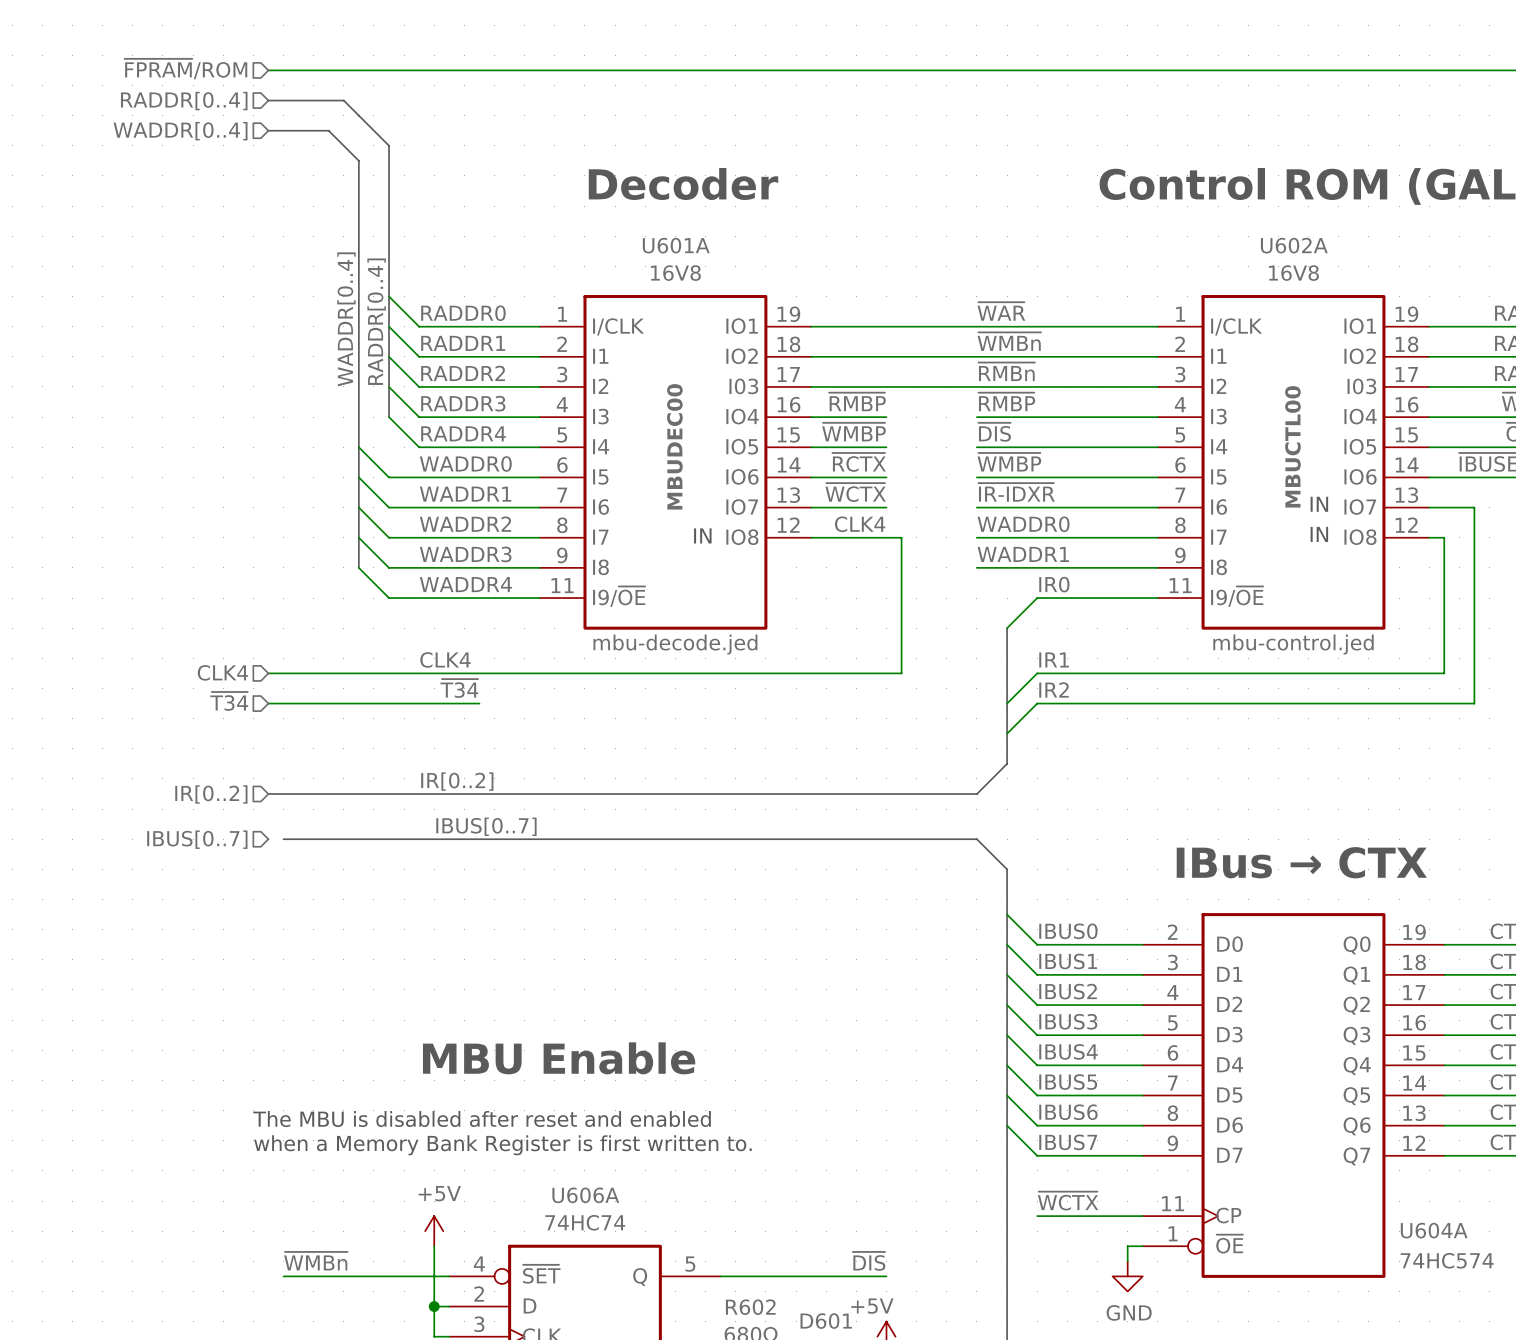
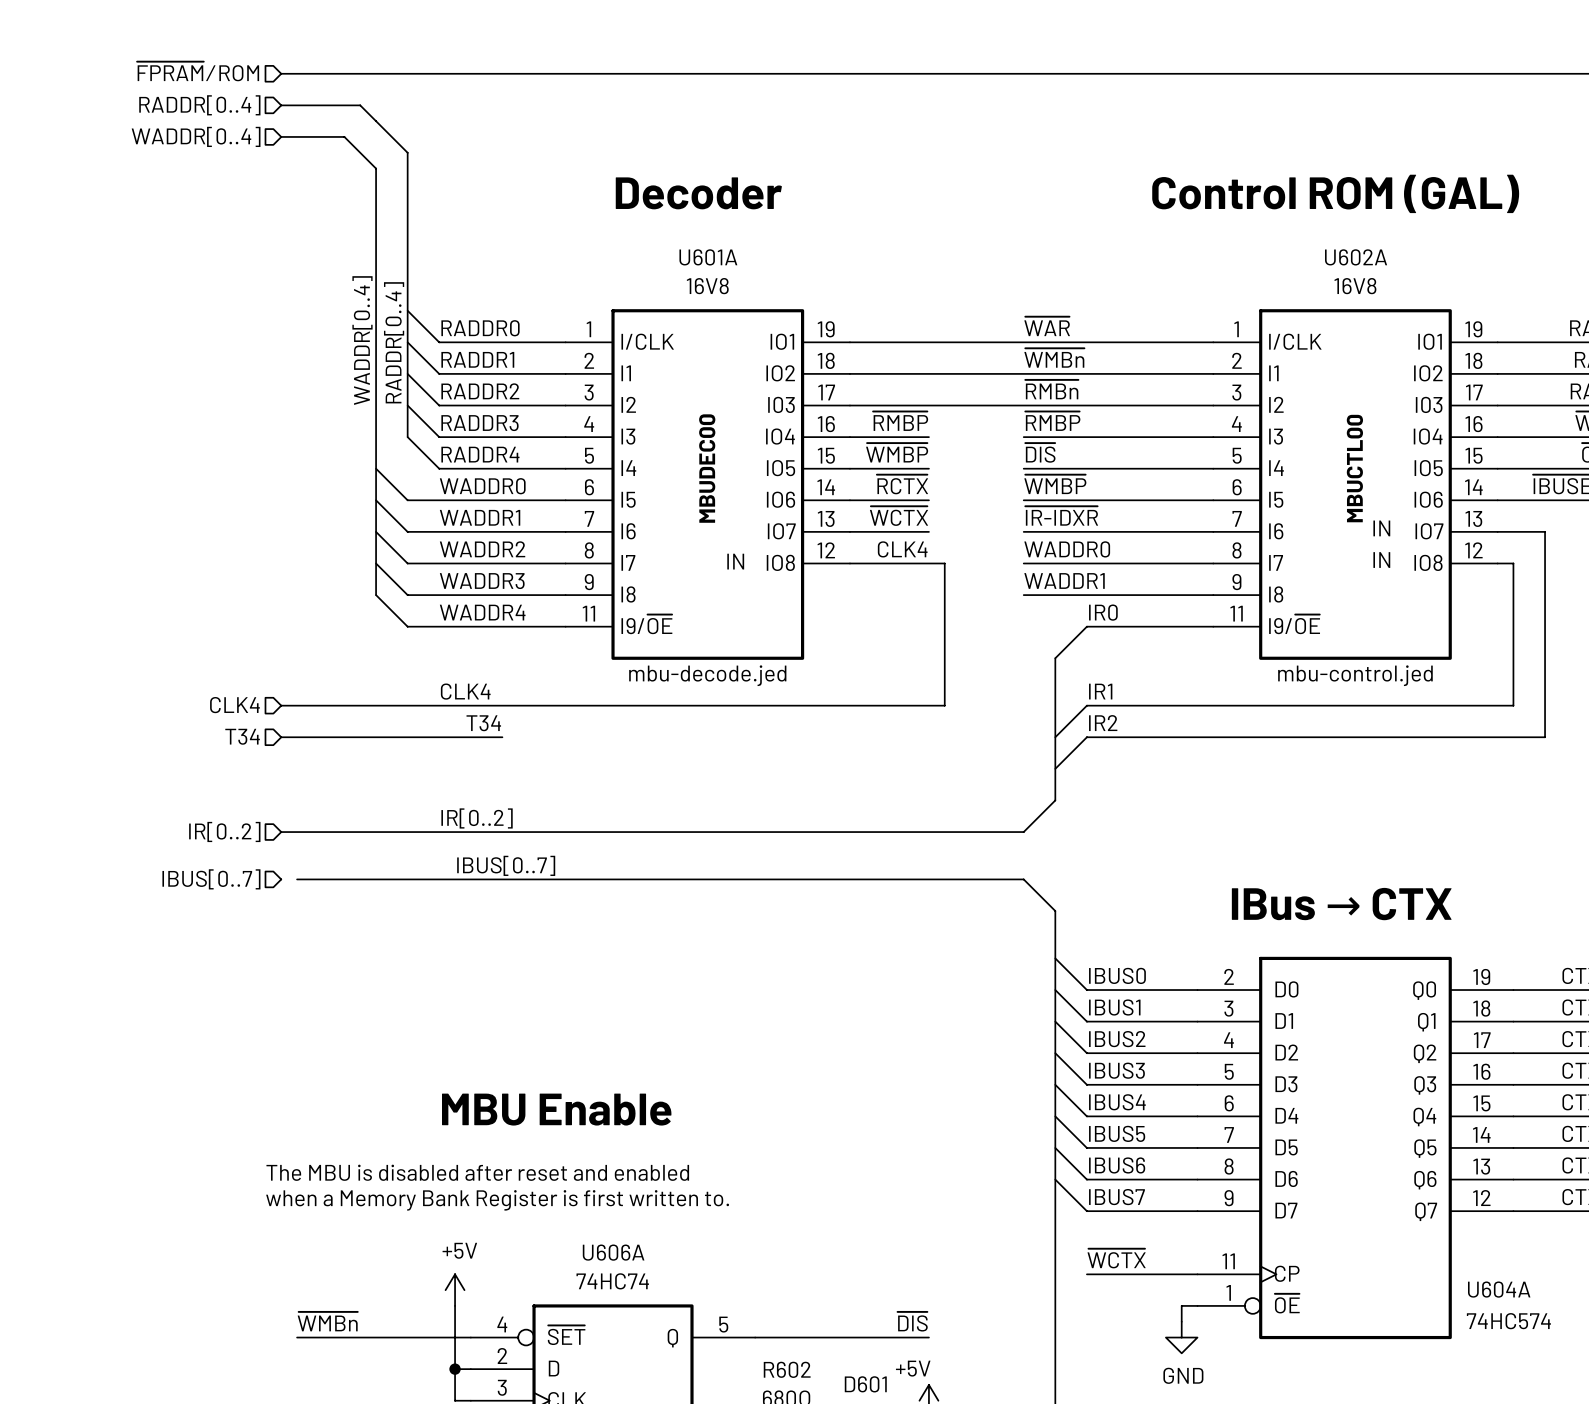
label: ~{T34} (459, 688) -> T34 (483, 723)
hierarchical label: ~{T34} (229, 701) -> T34 (242, 736)

